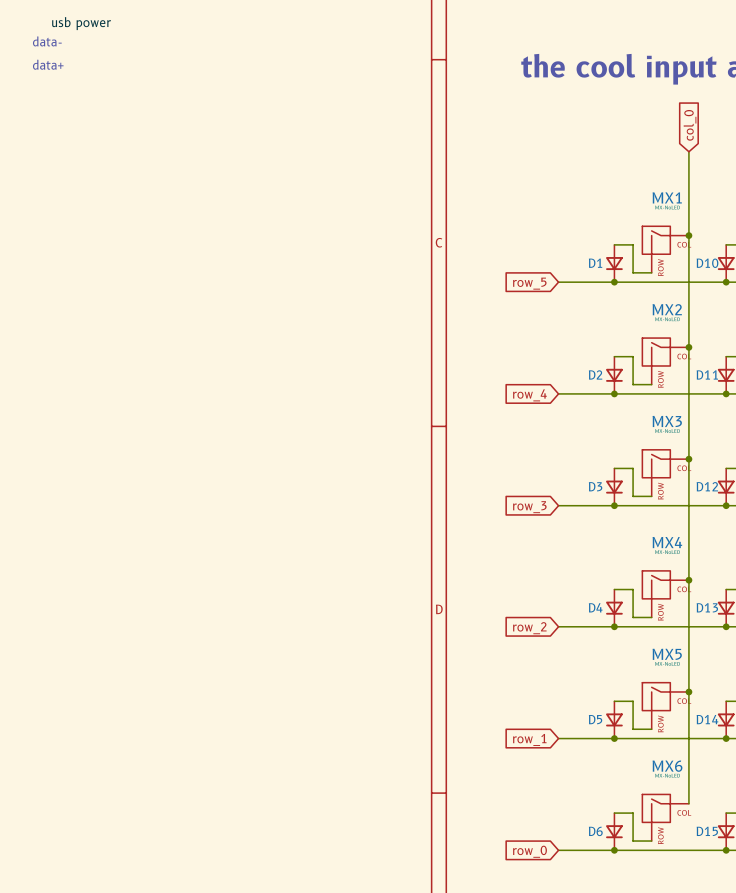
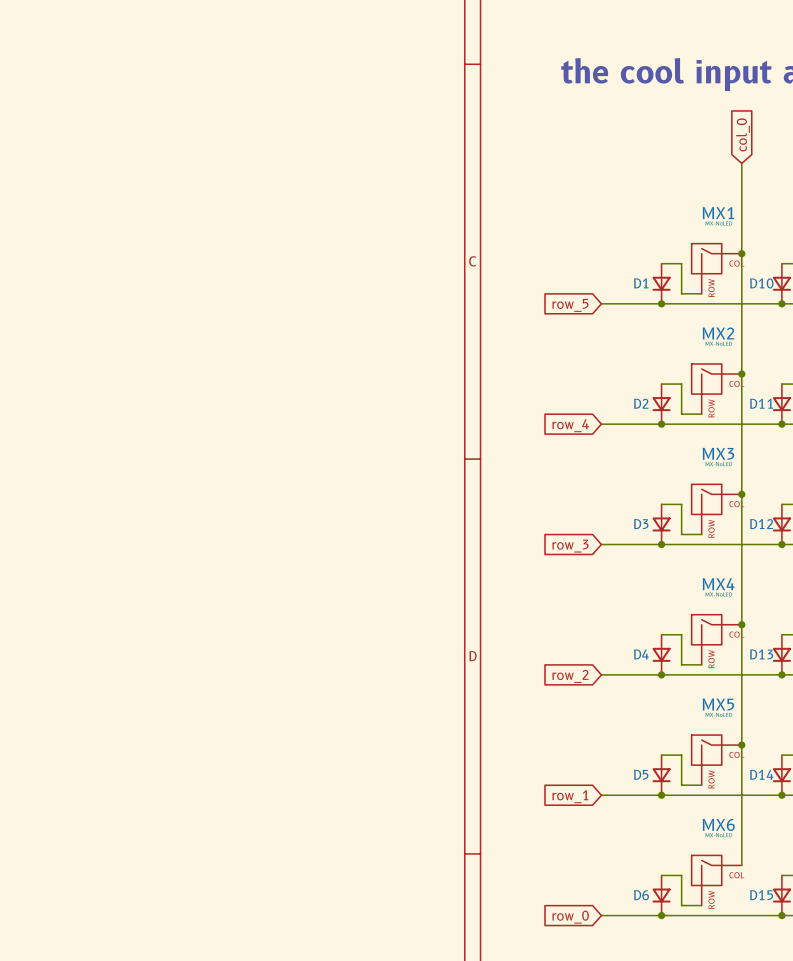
label: usb power (81, 23) -> none
text: data- (47, 41) -> none
text: data+ (48, 64) -> none

